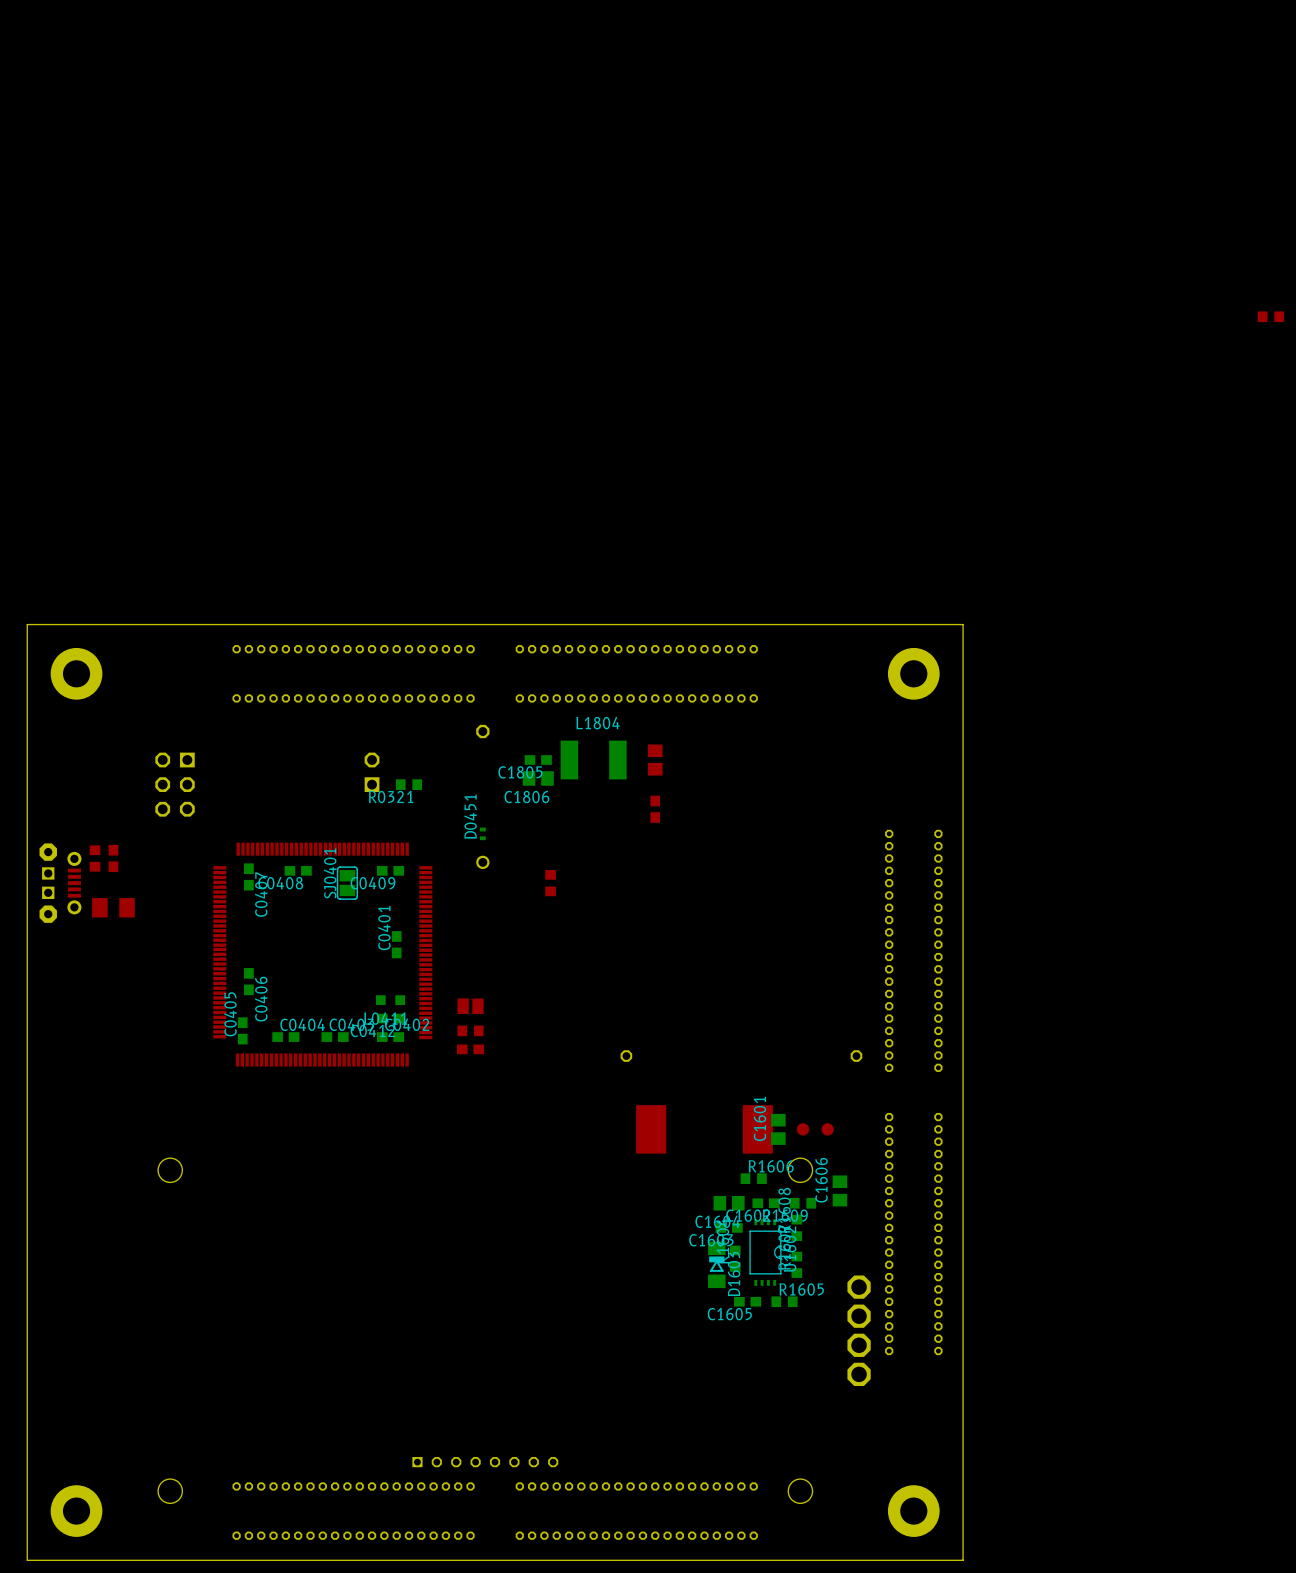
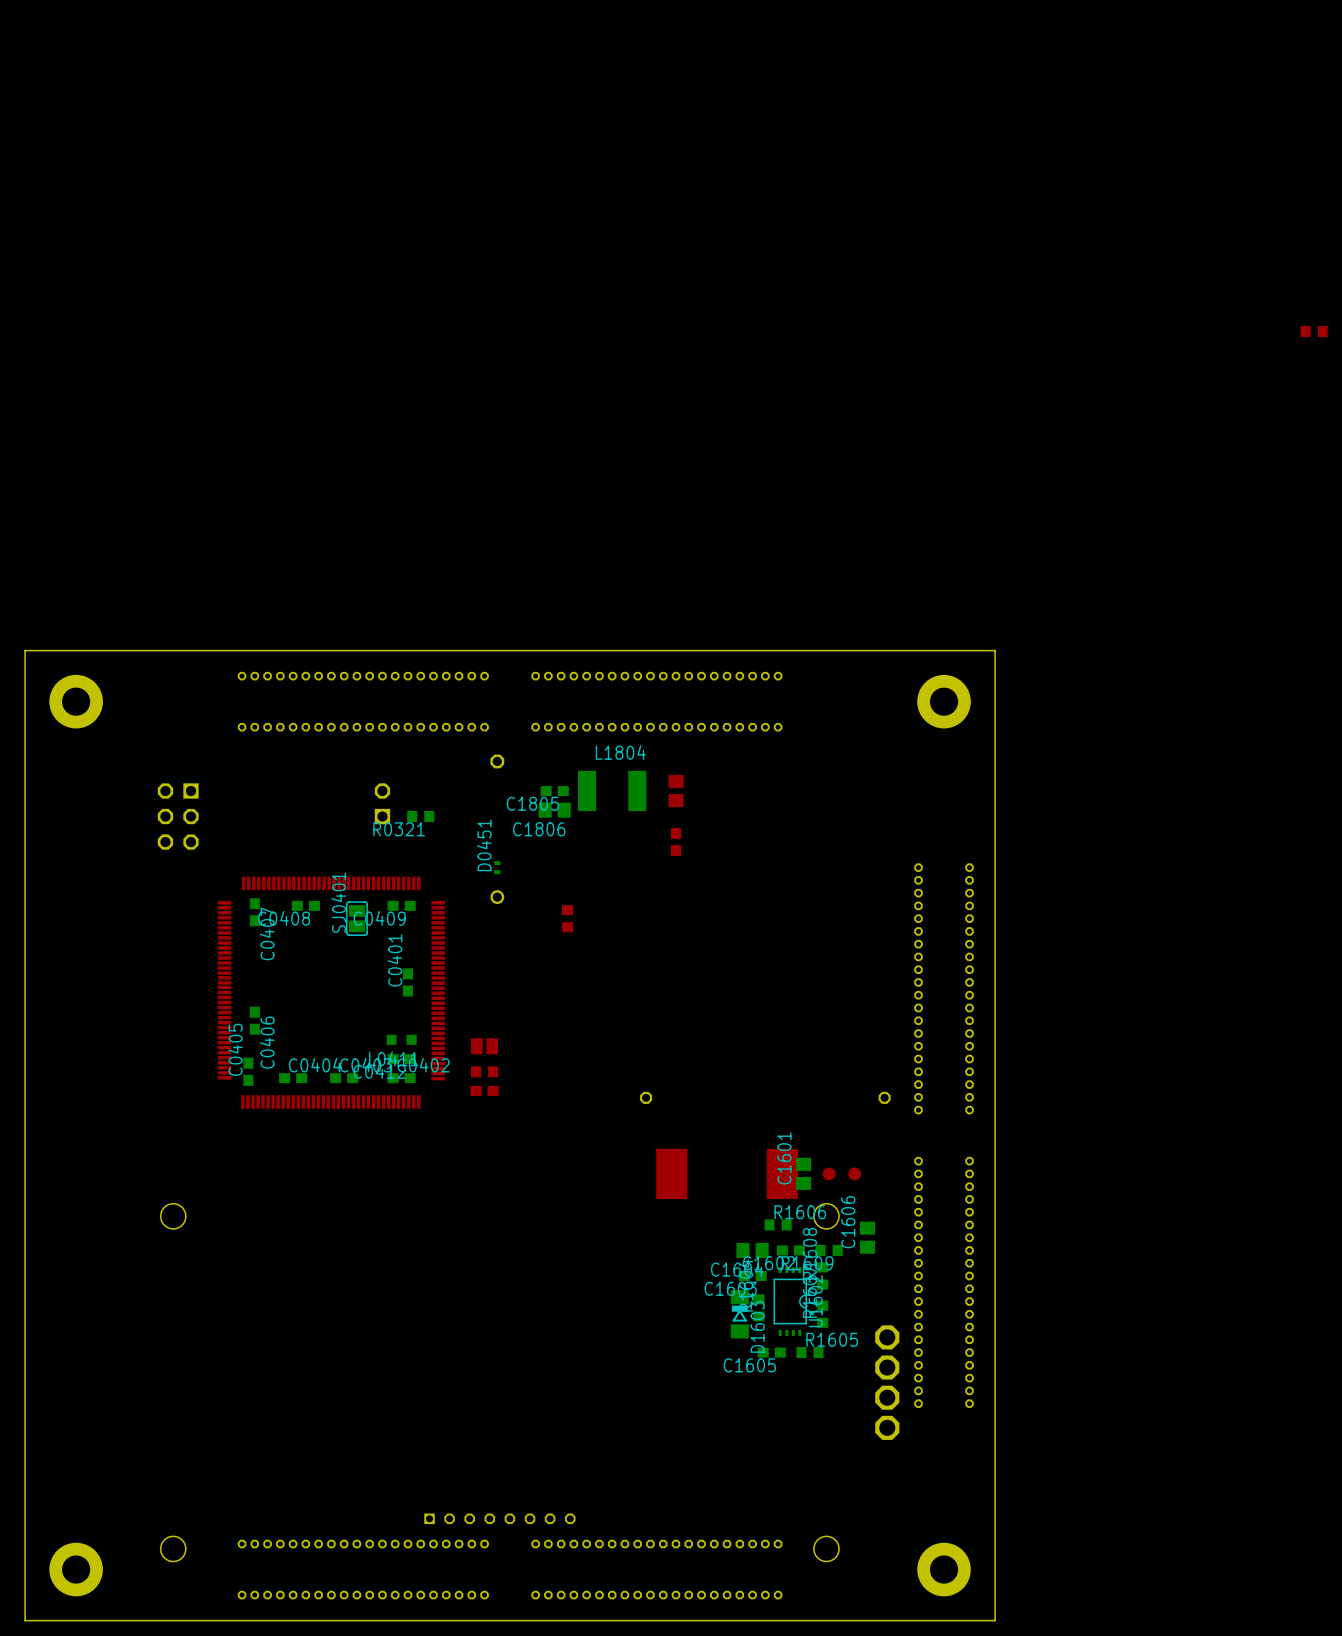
part: (95, 858) -> none
part: (113, 858) -> none
part: (60, 883) -> none
part: (113, 907) -> none

